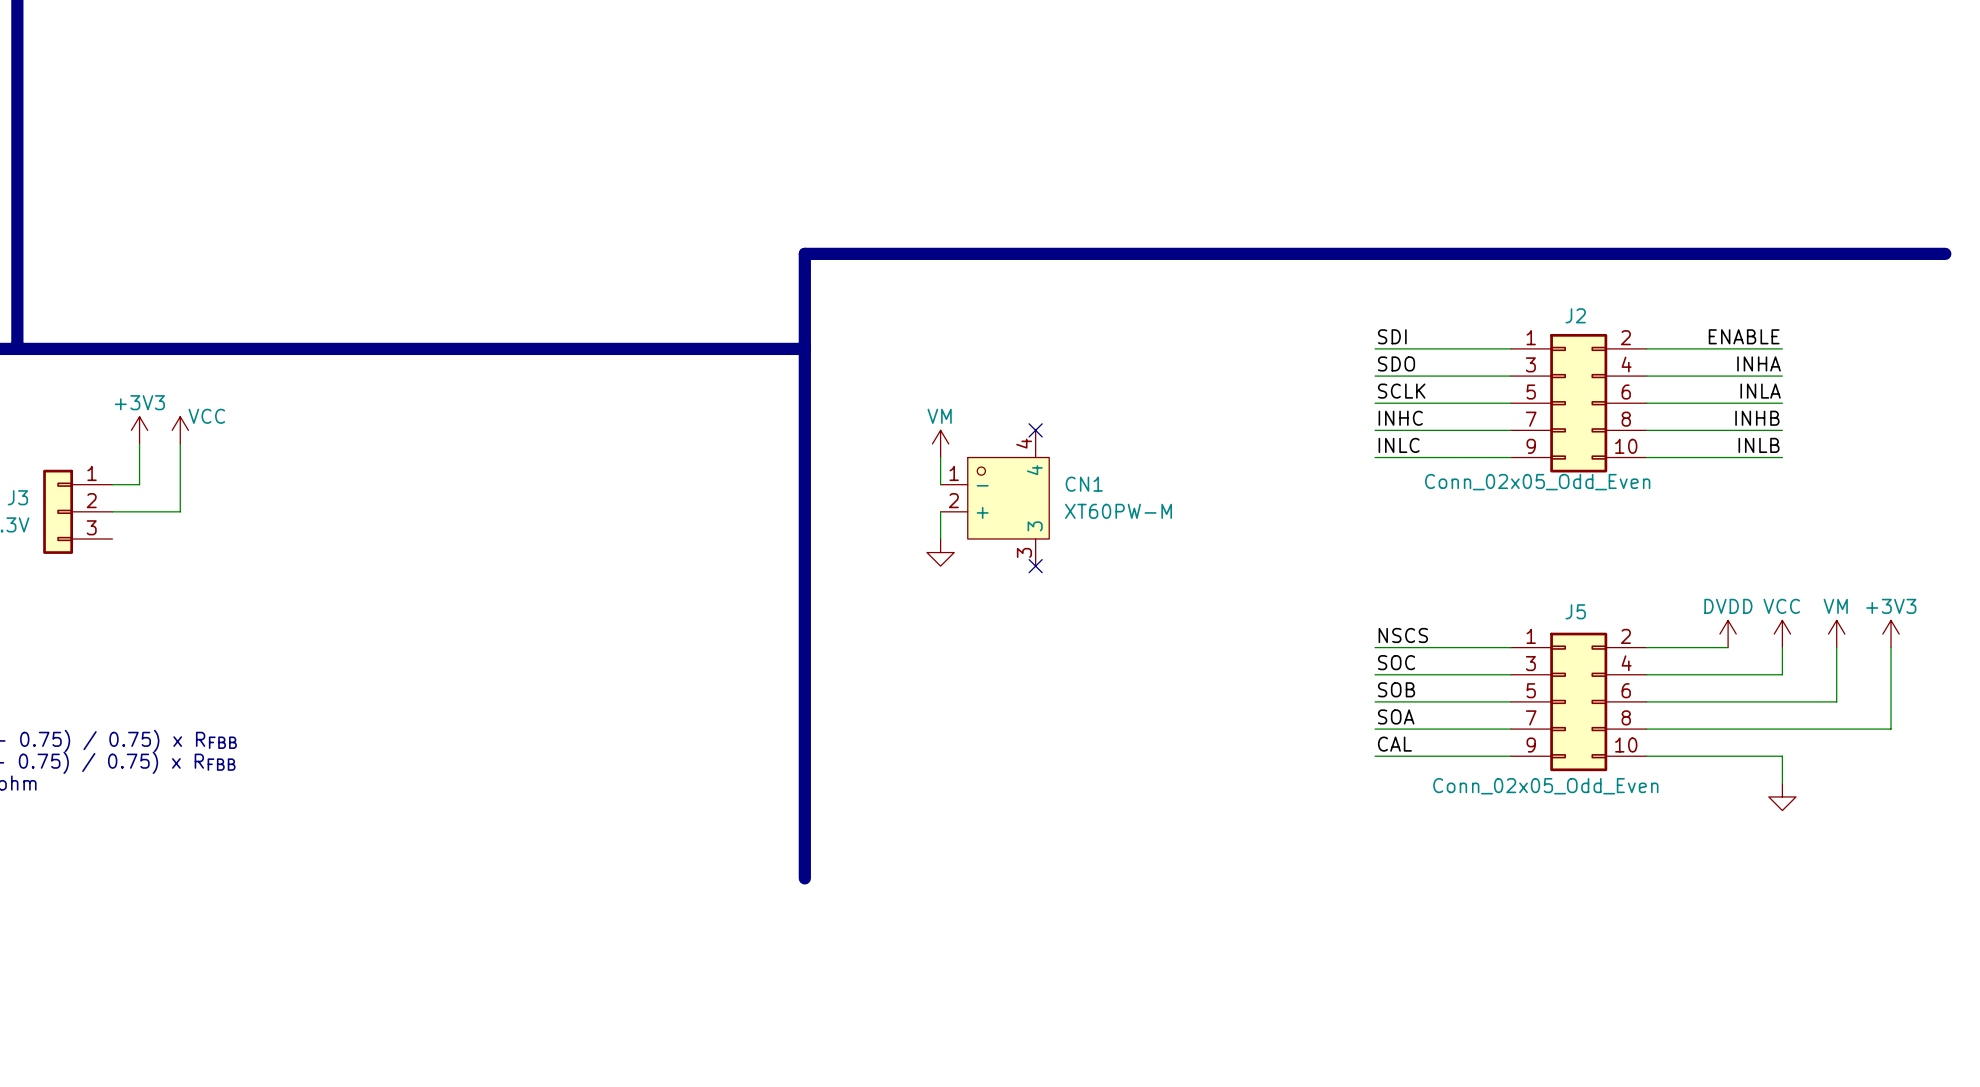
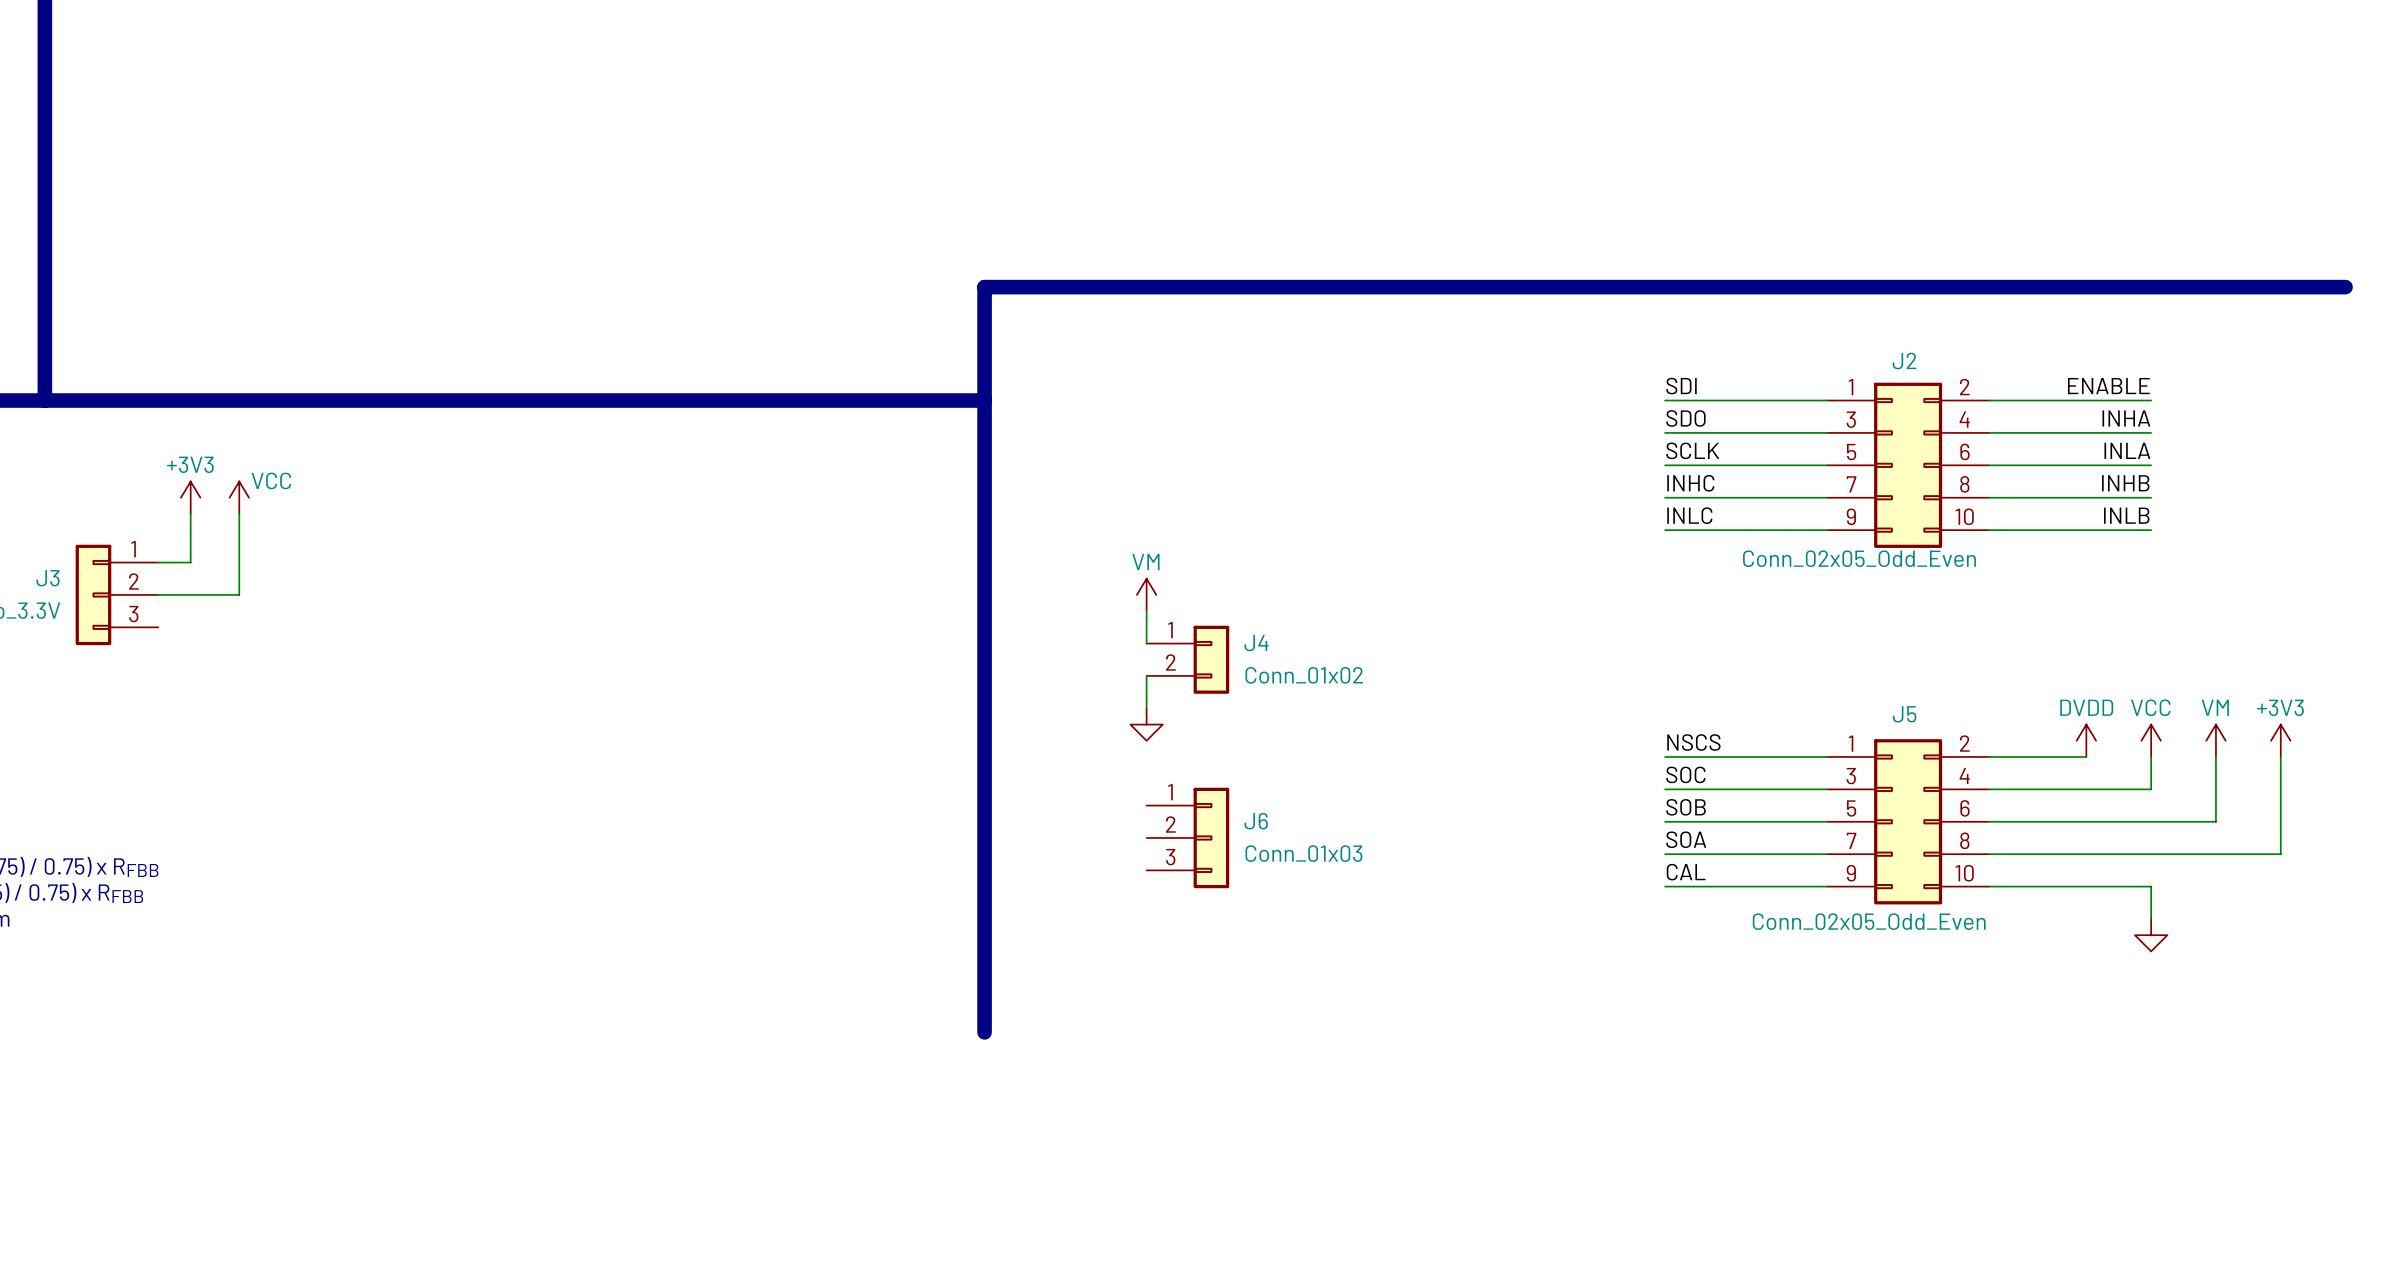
no-connect mark: (1035, 430) -> none
power symbol position: VM (940, 443) -> VM (1146, 594)
wire: (940, 457) (940, 484) -> (1146, 675) (1146, 708)
CN1: XT60PW-M (994, 498) -> none
power symbol position: (940, 552) -> (1146, 724)
J4: none -> Conn_01x02 (1187, 659)
no-connect mark: (1035, 566) -> none
J6: none -> Conn_01x03 (1187, 837)

